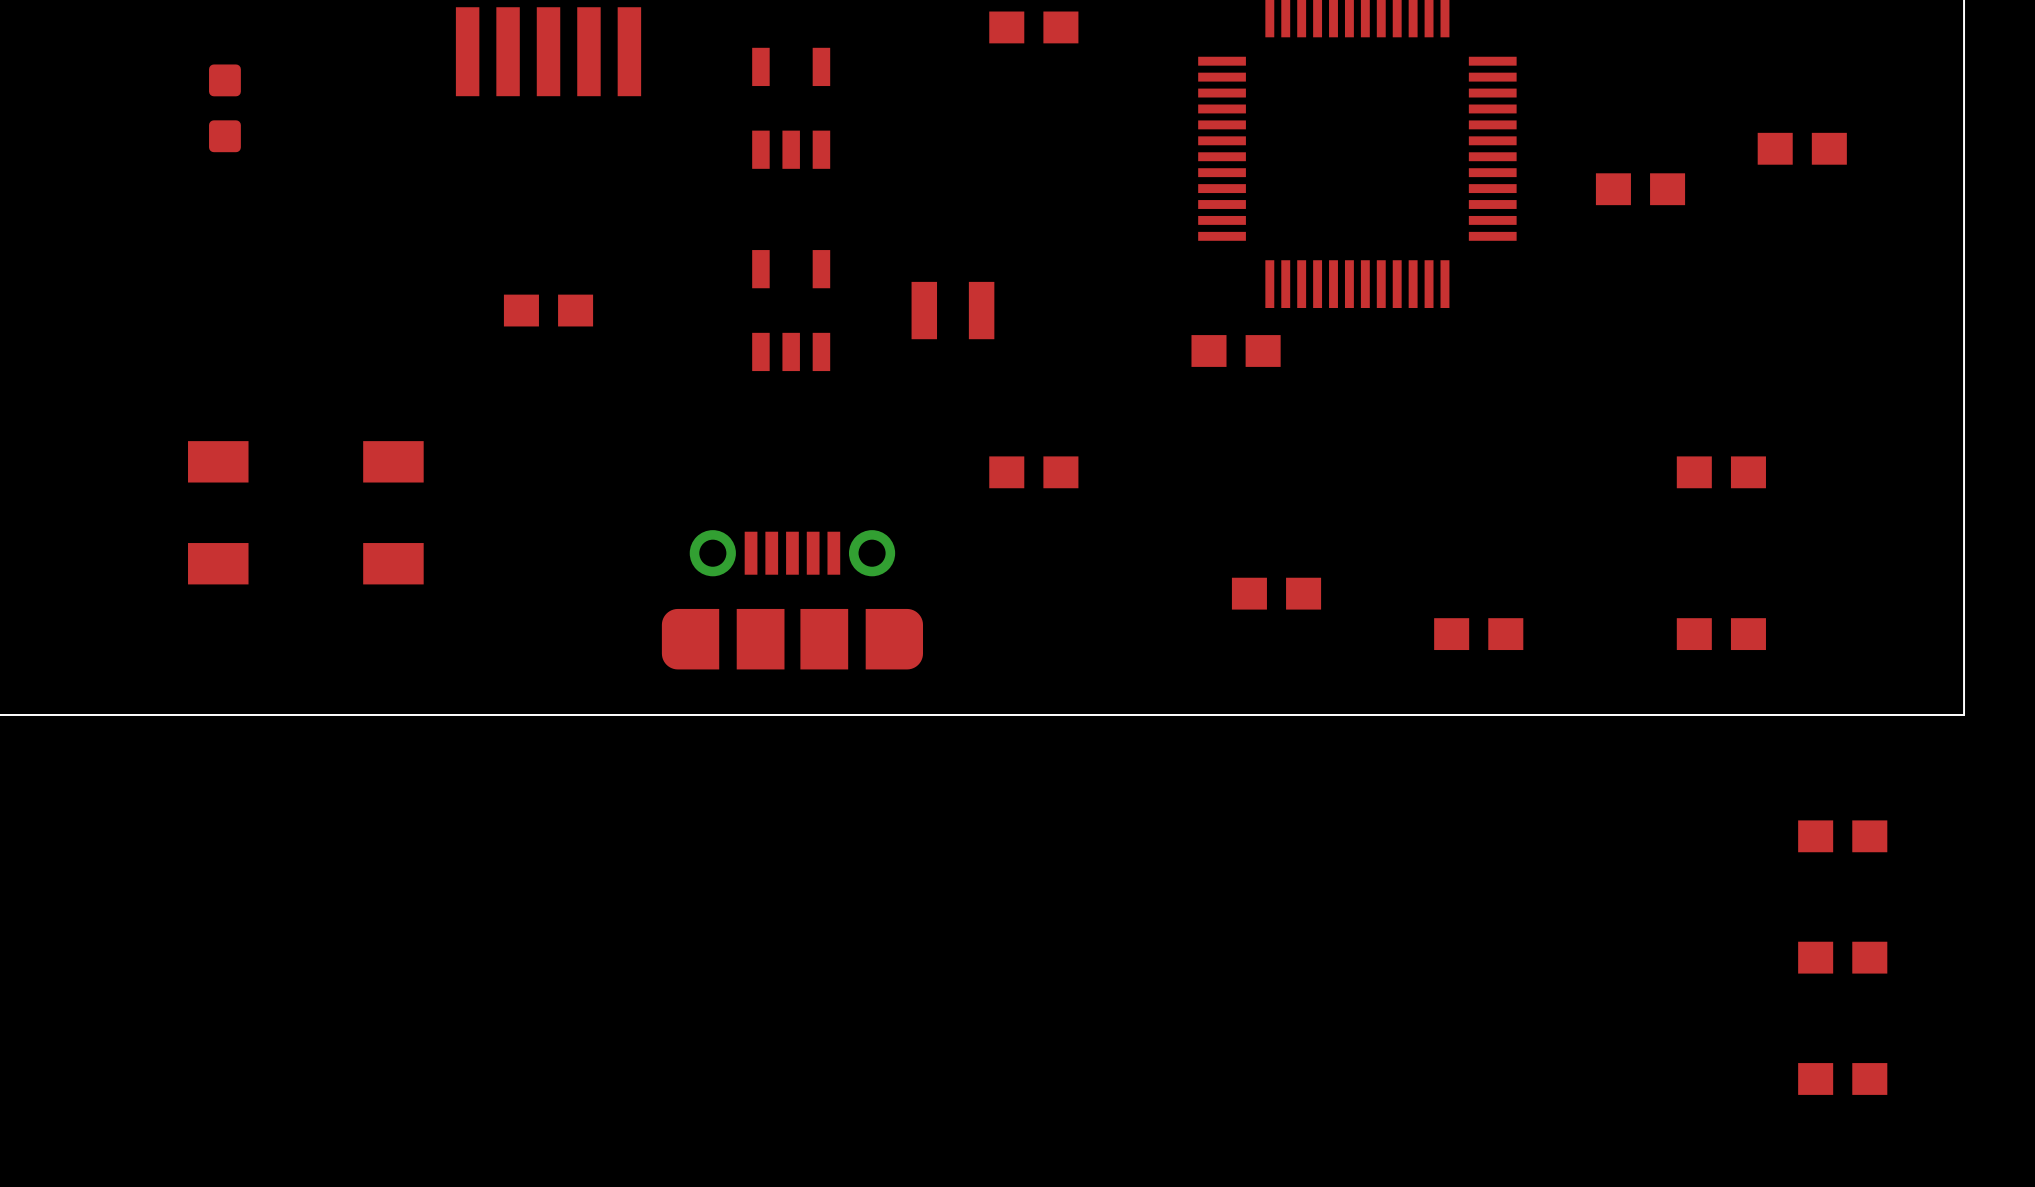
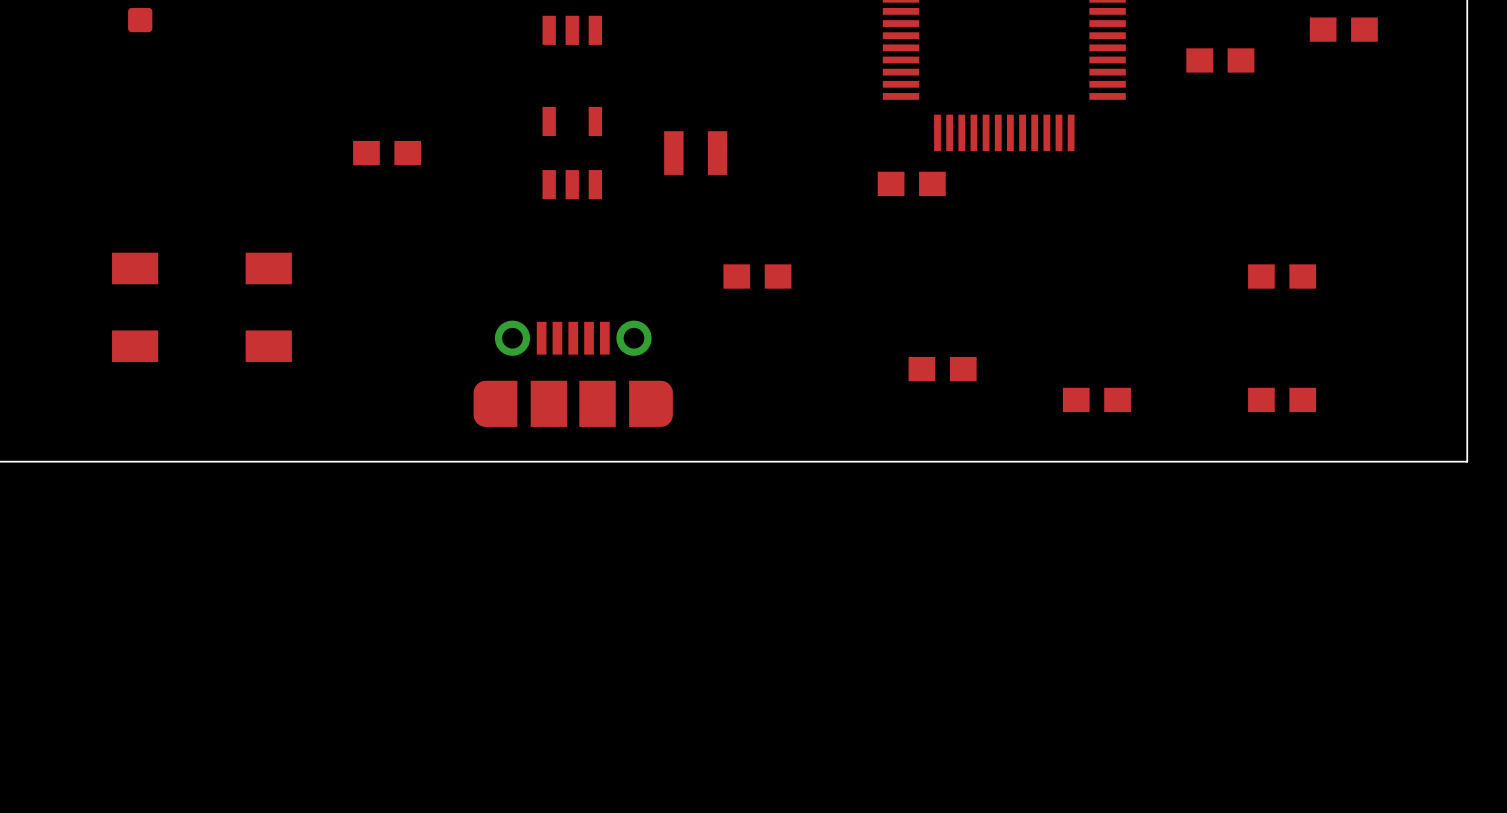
part: (1842, 836) -> none
part: (1842, 957) -> none
part: (1842, 1078) -> none

